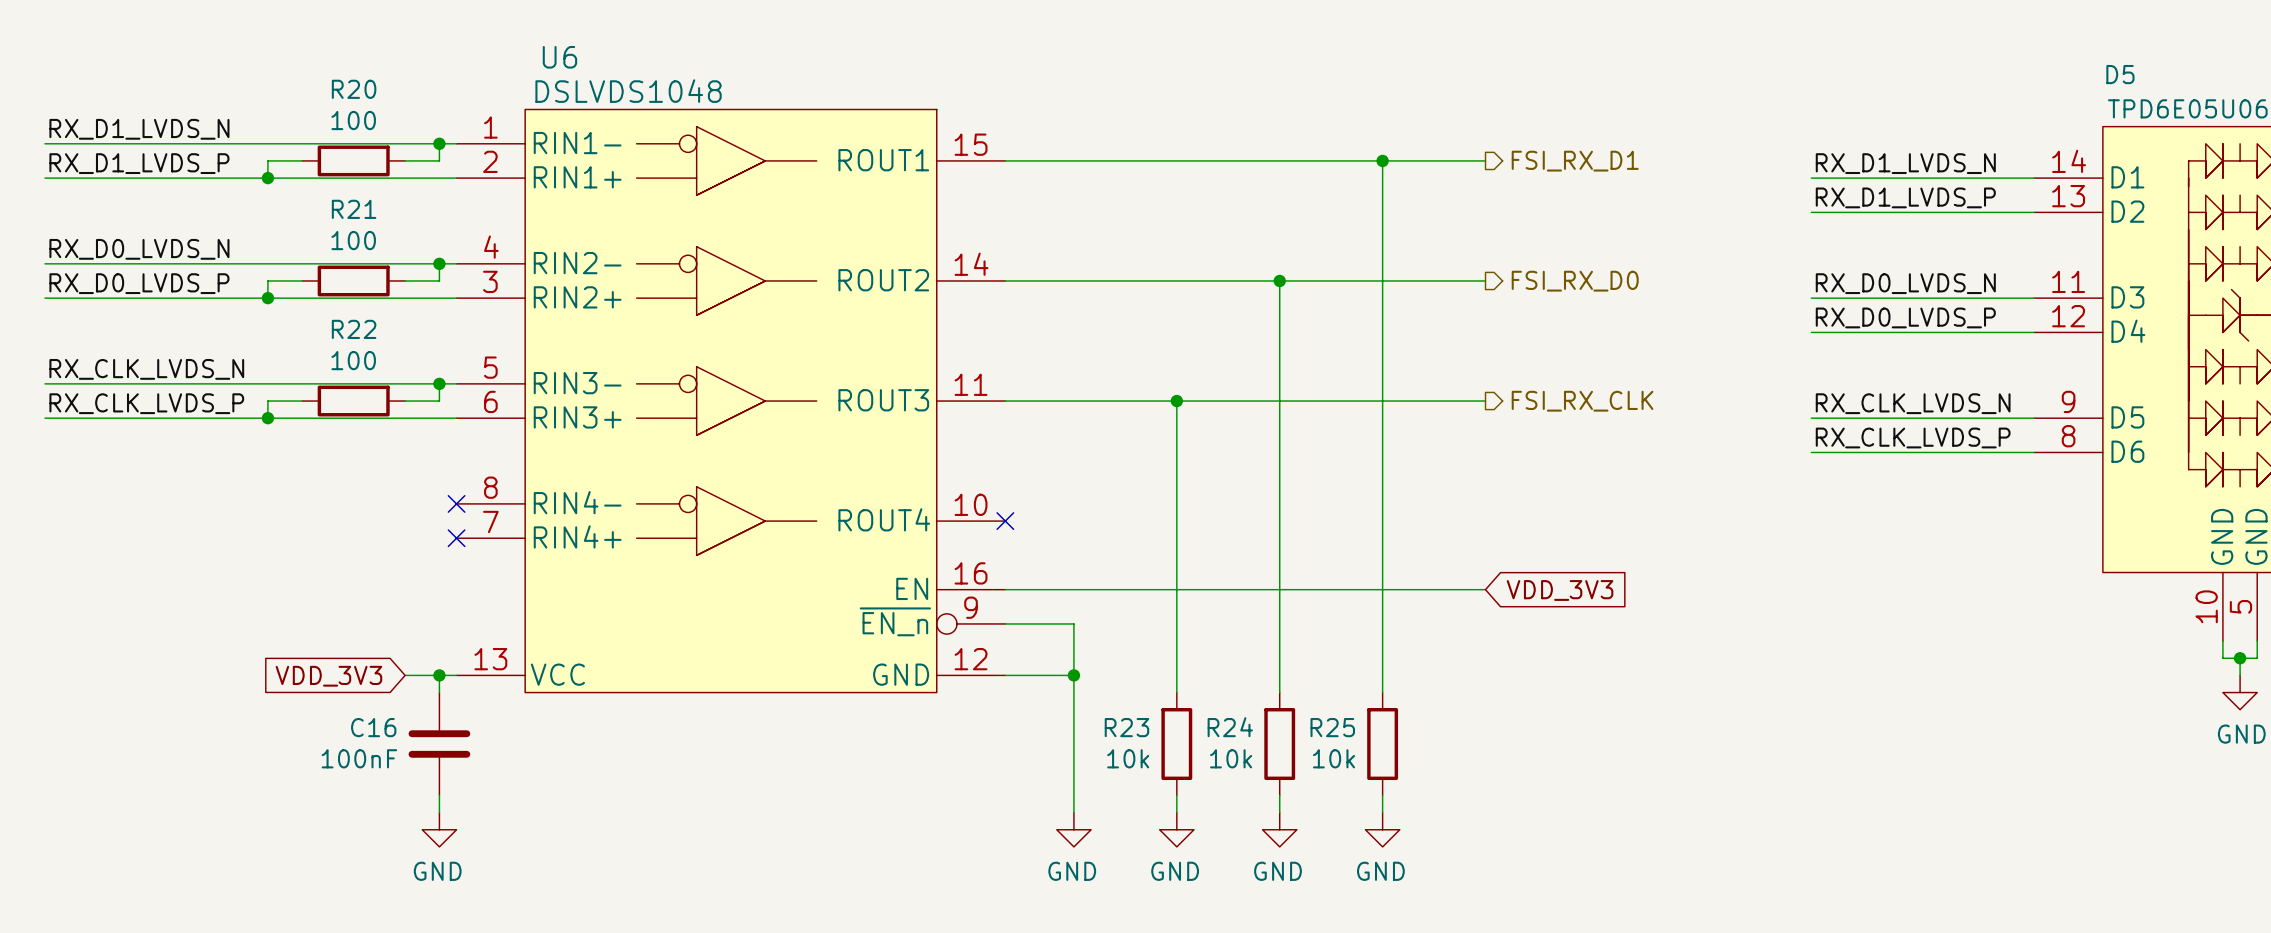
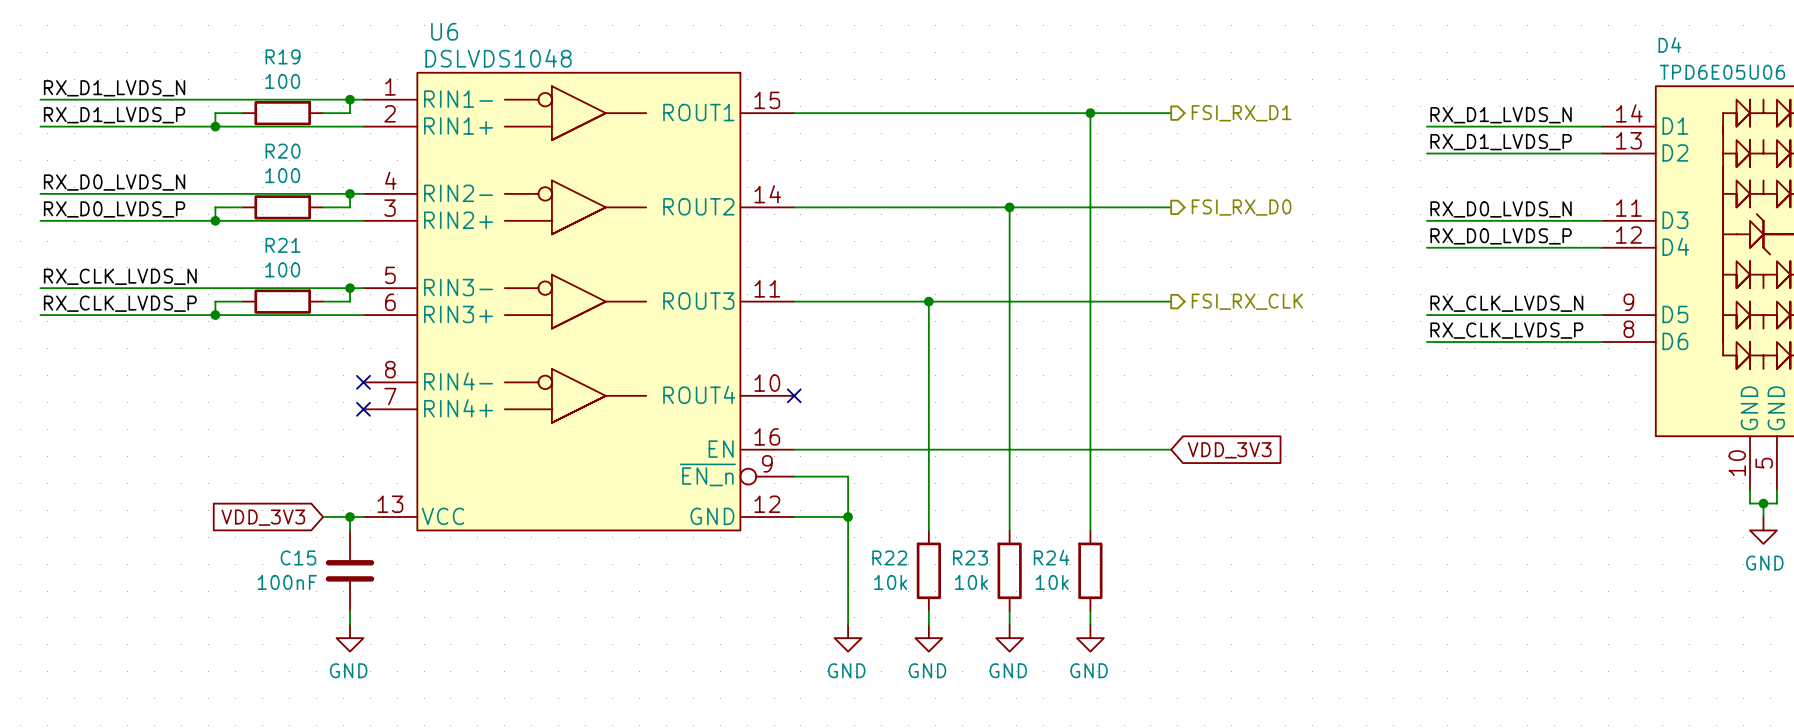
D5 name: D5 (2120, 74) -> D4 (1669, 45)
R20 name: R20 (354, 89) -> R19 (283, 56)
R21 name: R21 (354, 209) -> R20 (283, 151)
R22 name: R22 (354, 329) -> R21 (283, 245)
C16 name: C16 (373, 727) -> C15 (298, 557)
R23 name: R23 (1126, 727) -> R22 (889, 557)
R24 name: R24 (1230, 727) -> R23 (970, 557)
R25 name: R25 (1332, 727) -> R24 (1051, 557)

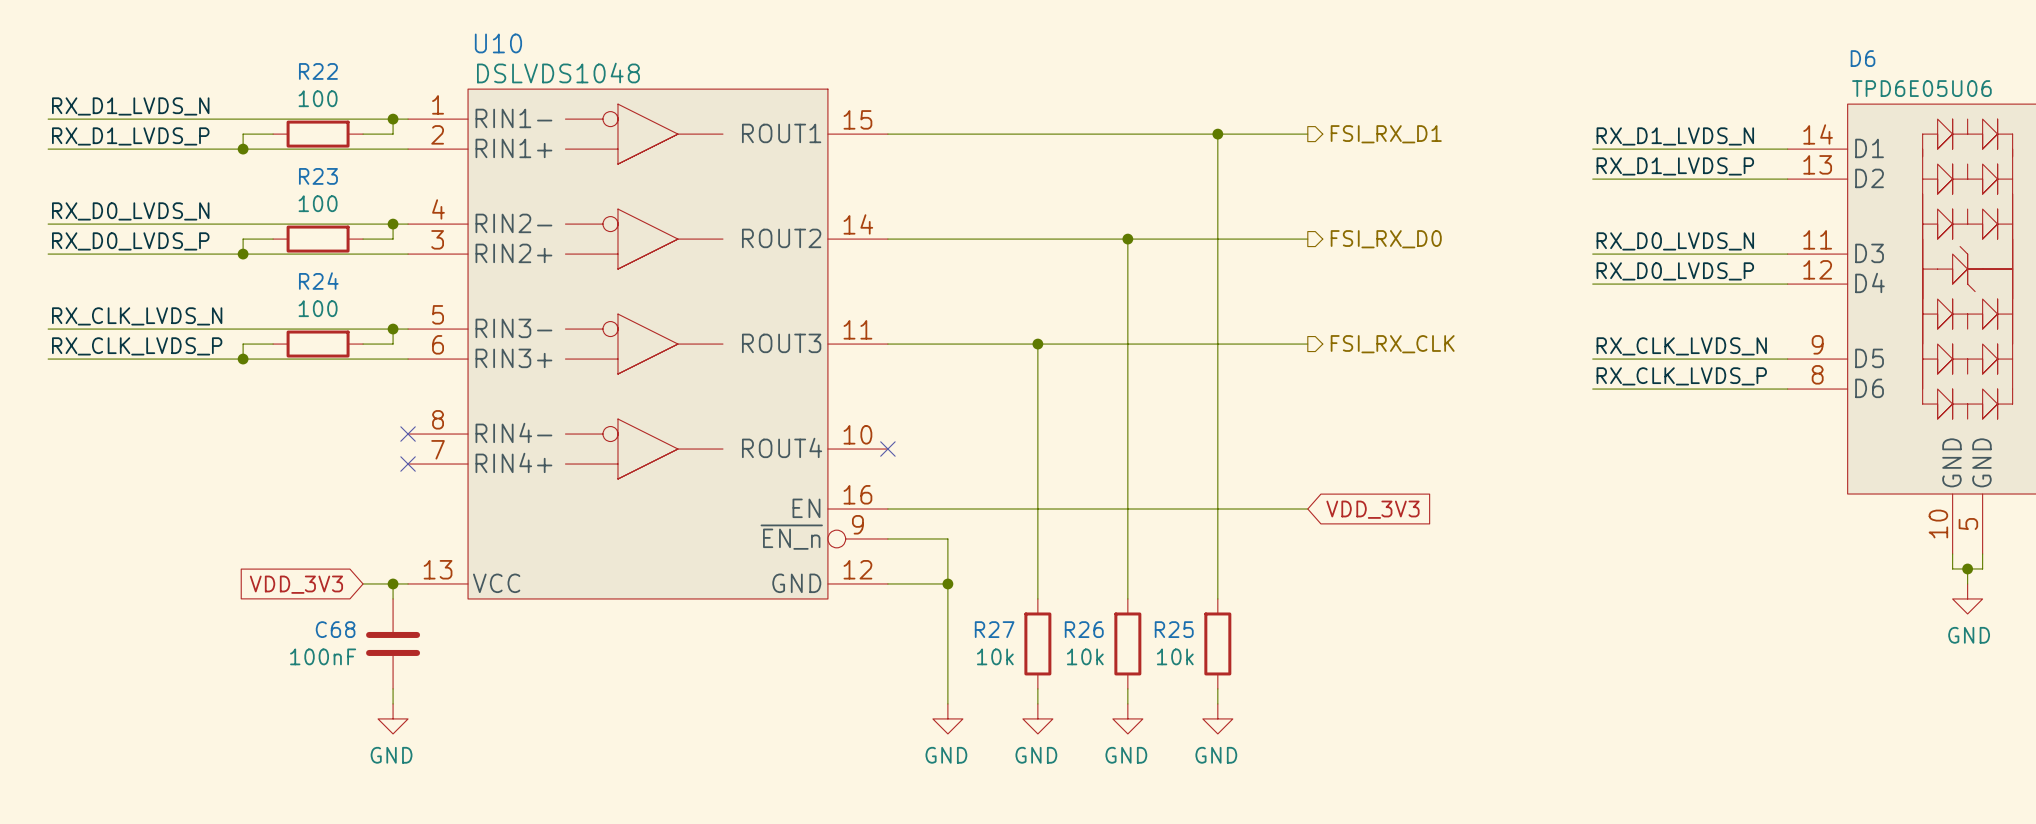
U6 name: U6 (444, 31) -> U10 (498, 43)
D4 name: D4 (1669, 45) -> D6 (1863, 58)
R19 name: R19 (283, 56) -> R22 (318, 71)
R20 name: R20 (283, 151) -> R23 (318, 176)
R21 name: R21 (283, 245) -> R24 (318, 281)
C15 name: C15 (298, 557) -> C68 (335, 629)
R22 name: R22 (889, 557) -> R27 (994, 629)
R23 name: R23 (970, 557) -> R26 (1084, 629)
R24 name: R24 (1051, 557) -> R25 (1174, 629)

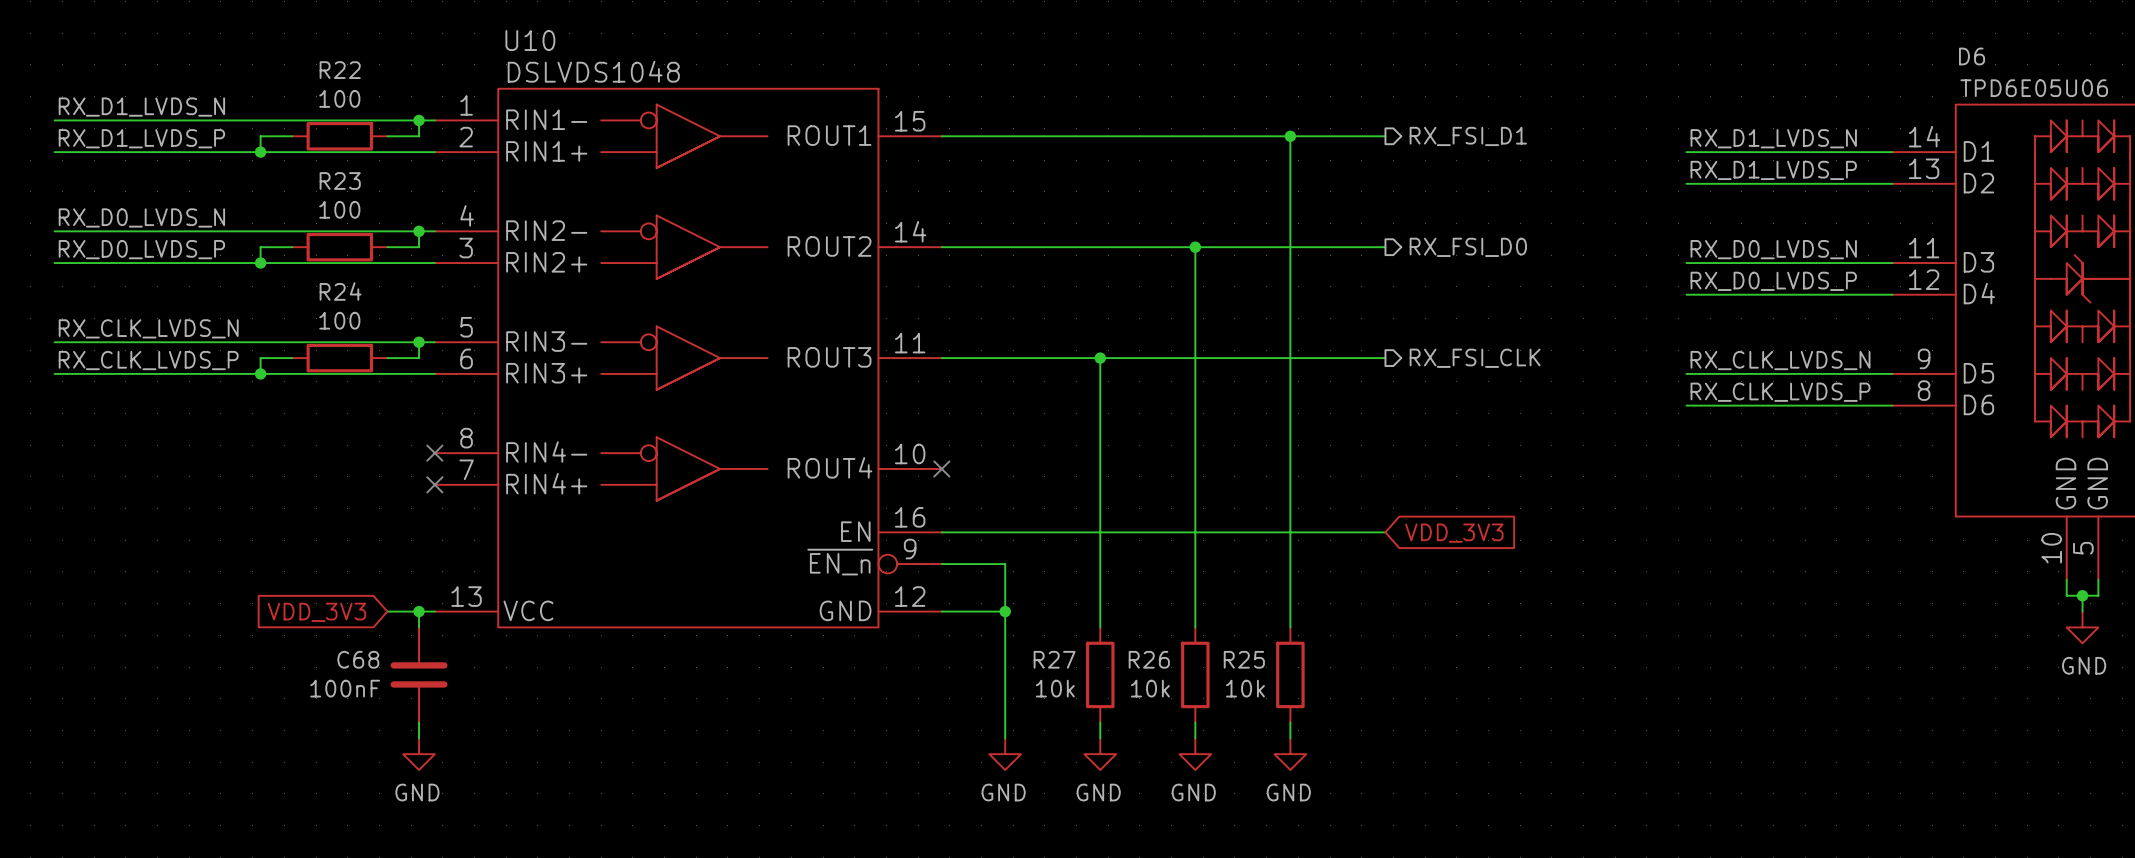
hierarchical label: FSI_RX_D1 (1386, 134) -> RX_FSI_D1 (1468, 136)
hierarchical label: FSI_RX_D0 (1386, 239) -> RX_FSI_D0 (1468, 247)
hierarchical label: FSI_RX_CLK (1392, 344) -> RX_FSI_CLK (1475, 358)

